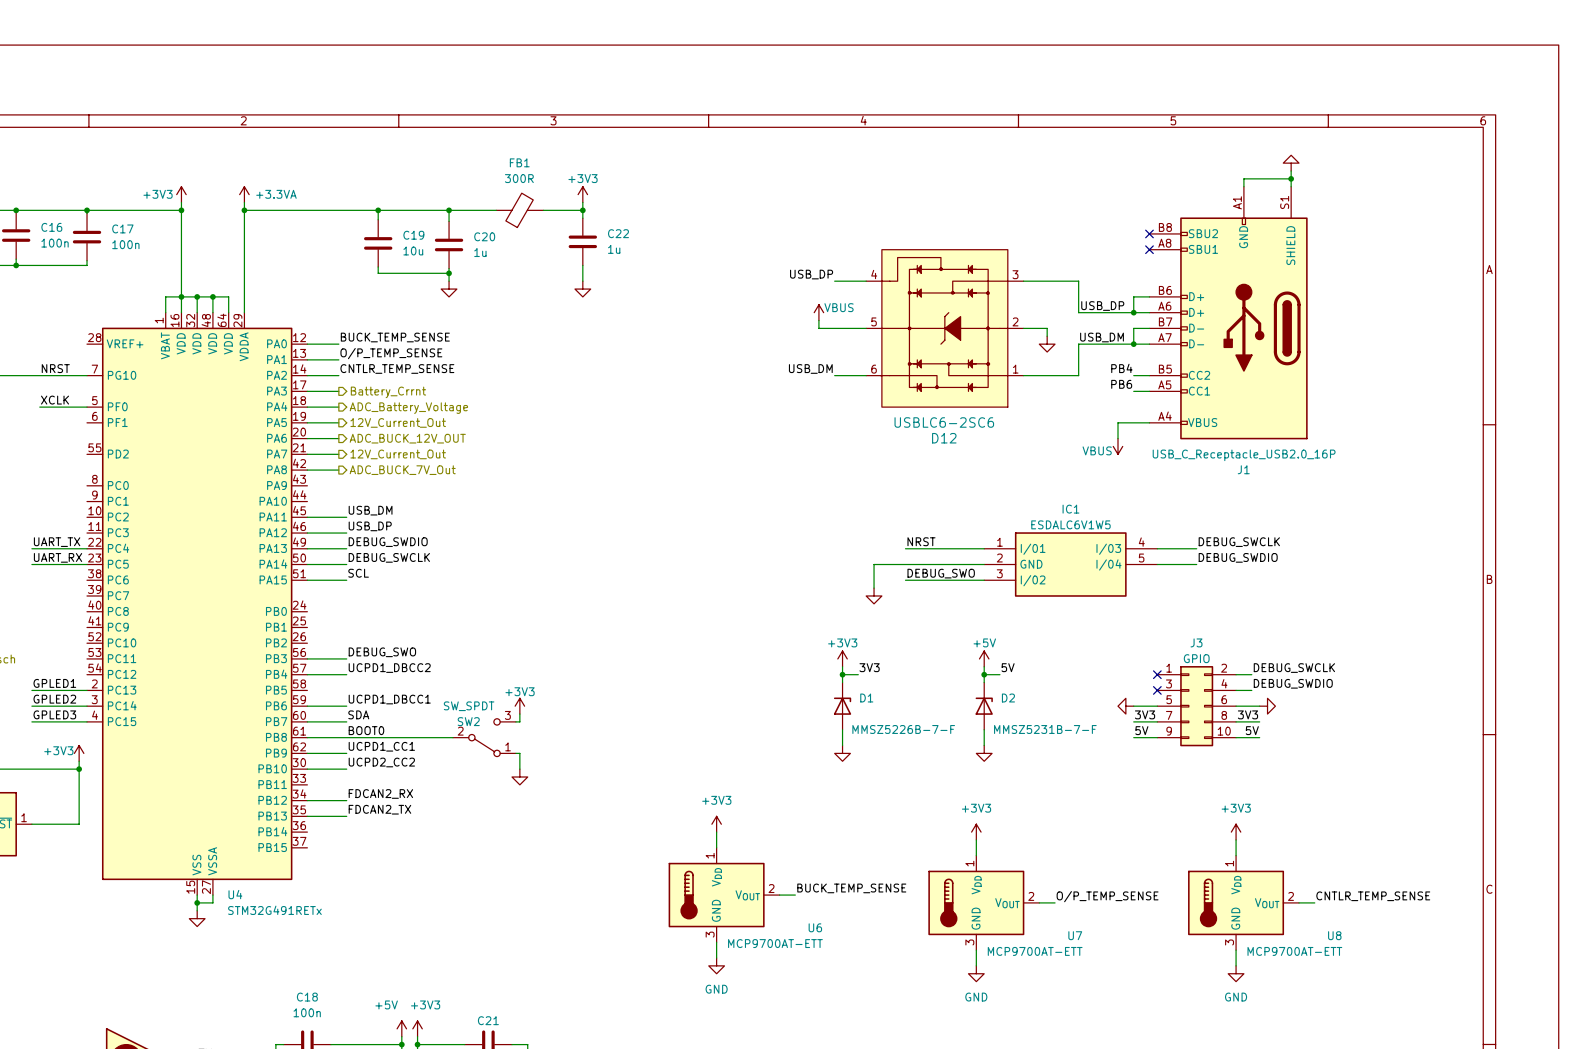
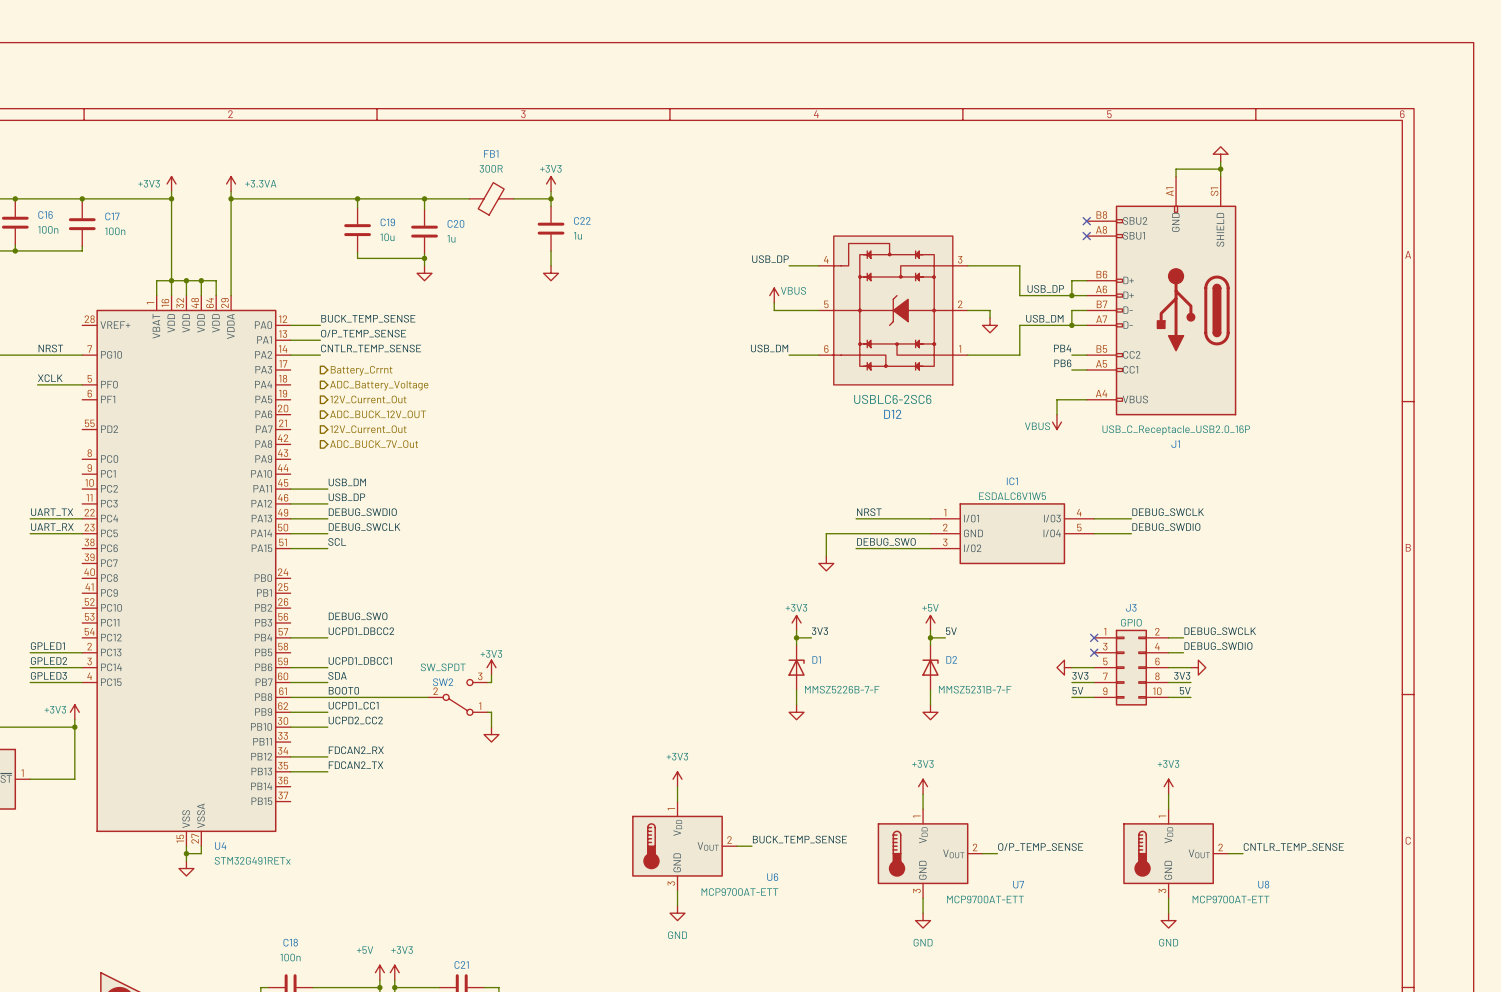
wire: (307, 391) (338, 391) -> none
wire: (307, 407) (338, 407) -> none
wire: (307, 422) (338, 422) -> none
wire: (307, 438) (338, 438) -> none
wire: (307, 454) (338, 454) -> none
wire: (307, 470) (338, 470) -> none
wire: (307, 658) (346, 658) -> none

